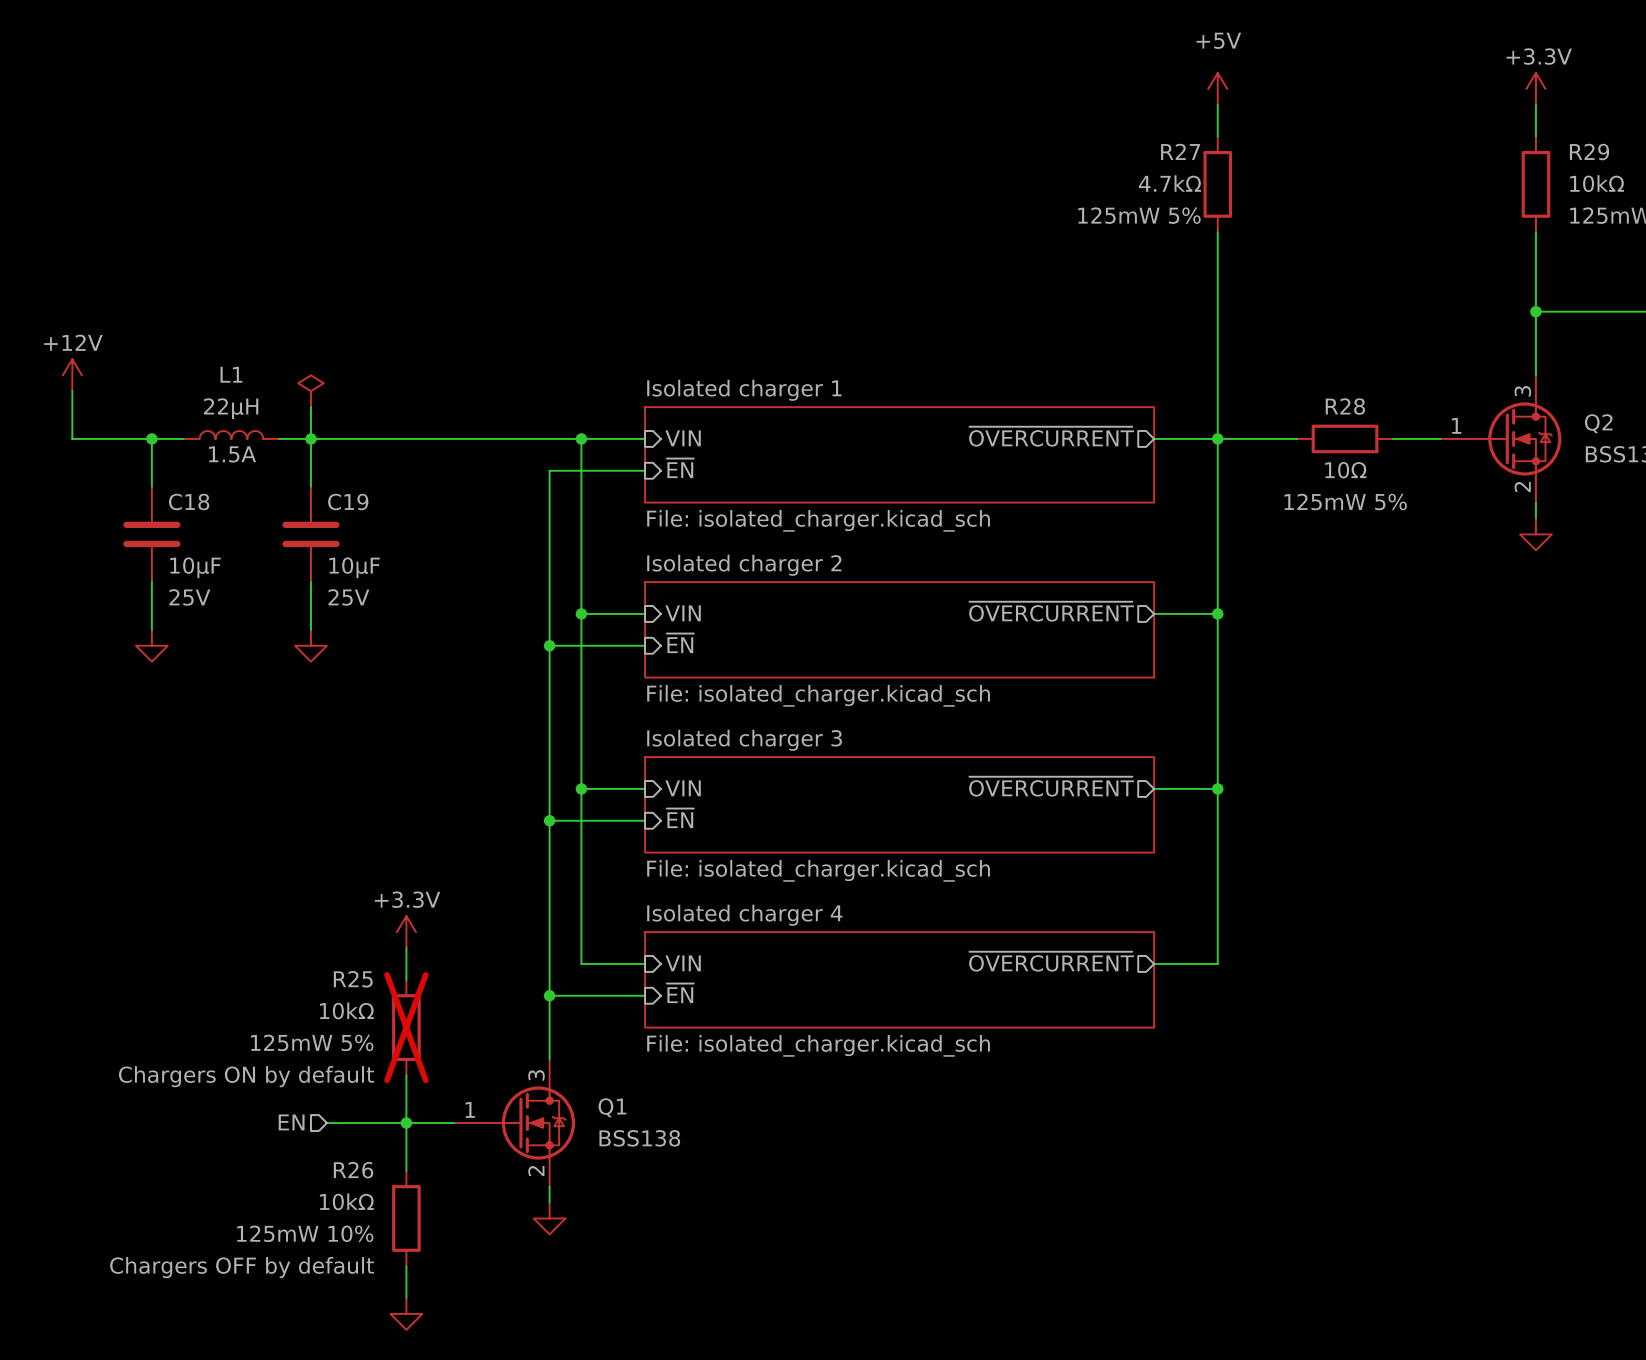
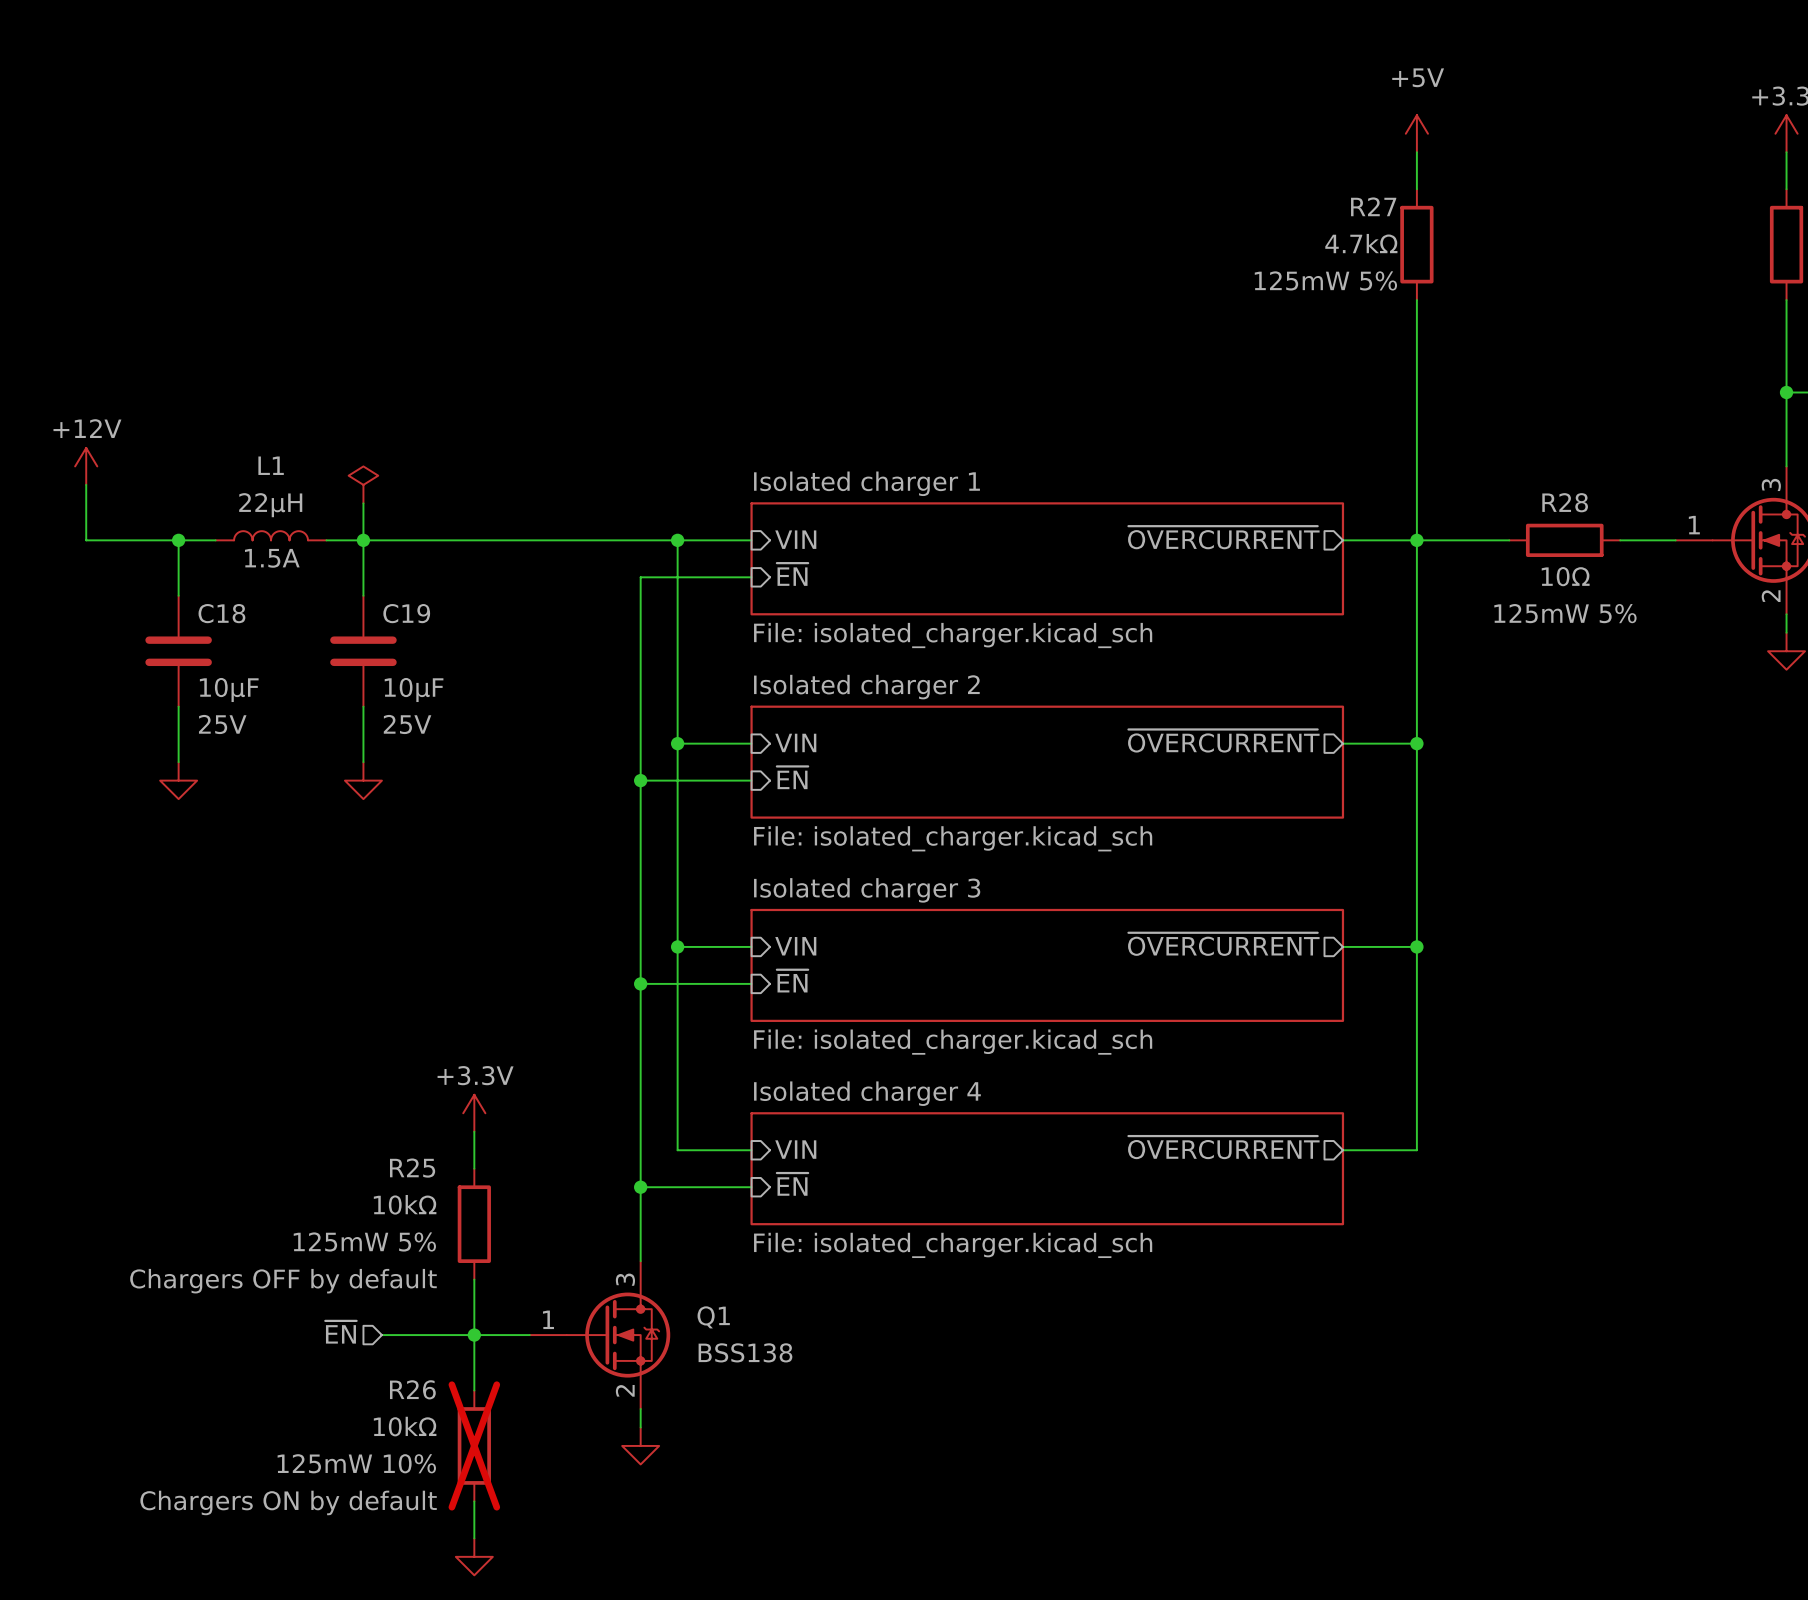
R25 do-not-place cross: (406, 1027) -> none
R25 text: Chargers ON by default (246, 1076) -> Chargers OFF by default (283, 1281)
hierarchical label: EN (291, 1122) -> ~{EN} (340, 1332)
R26 do-not-place cross: none -> (474, 1445)
R26 text: Chargers OFF by default (242, 1267) -> Chargers ON by default (288, 1502)

